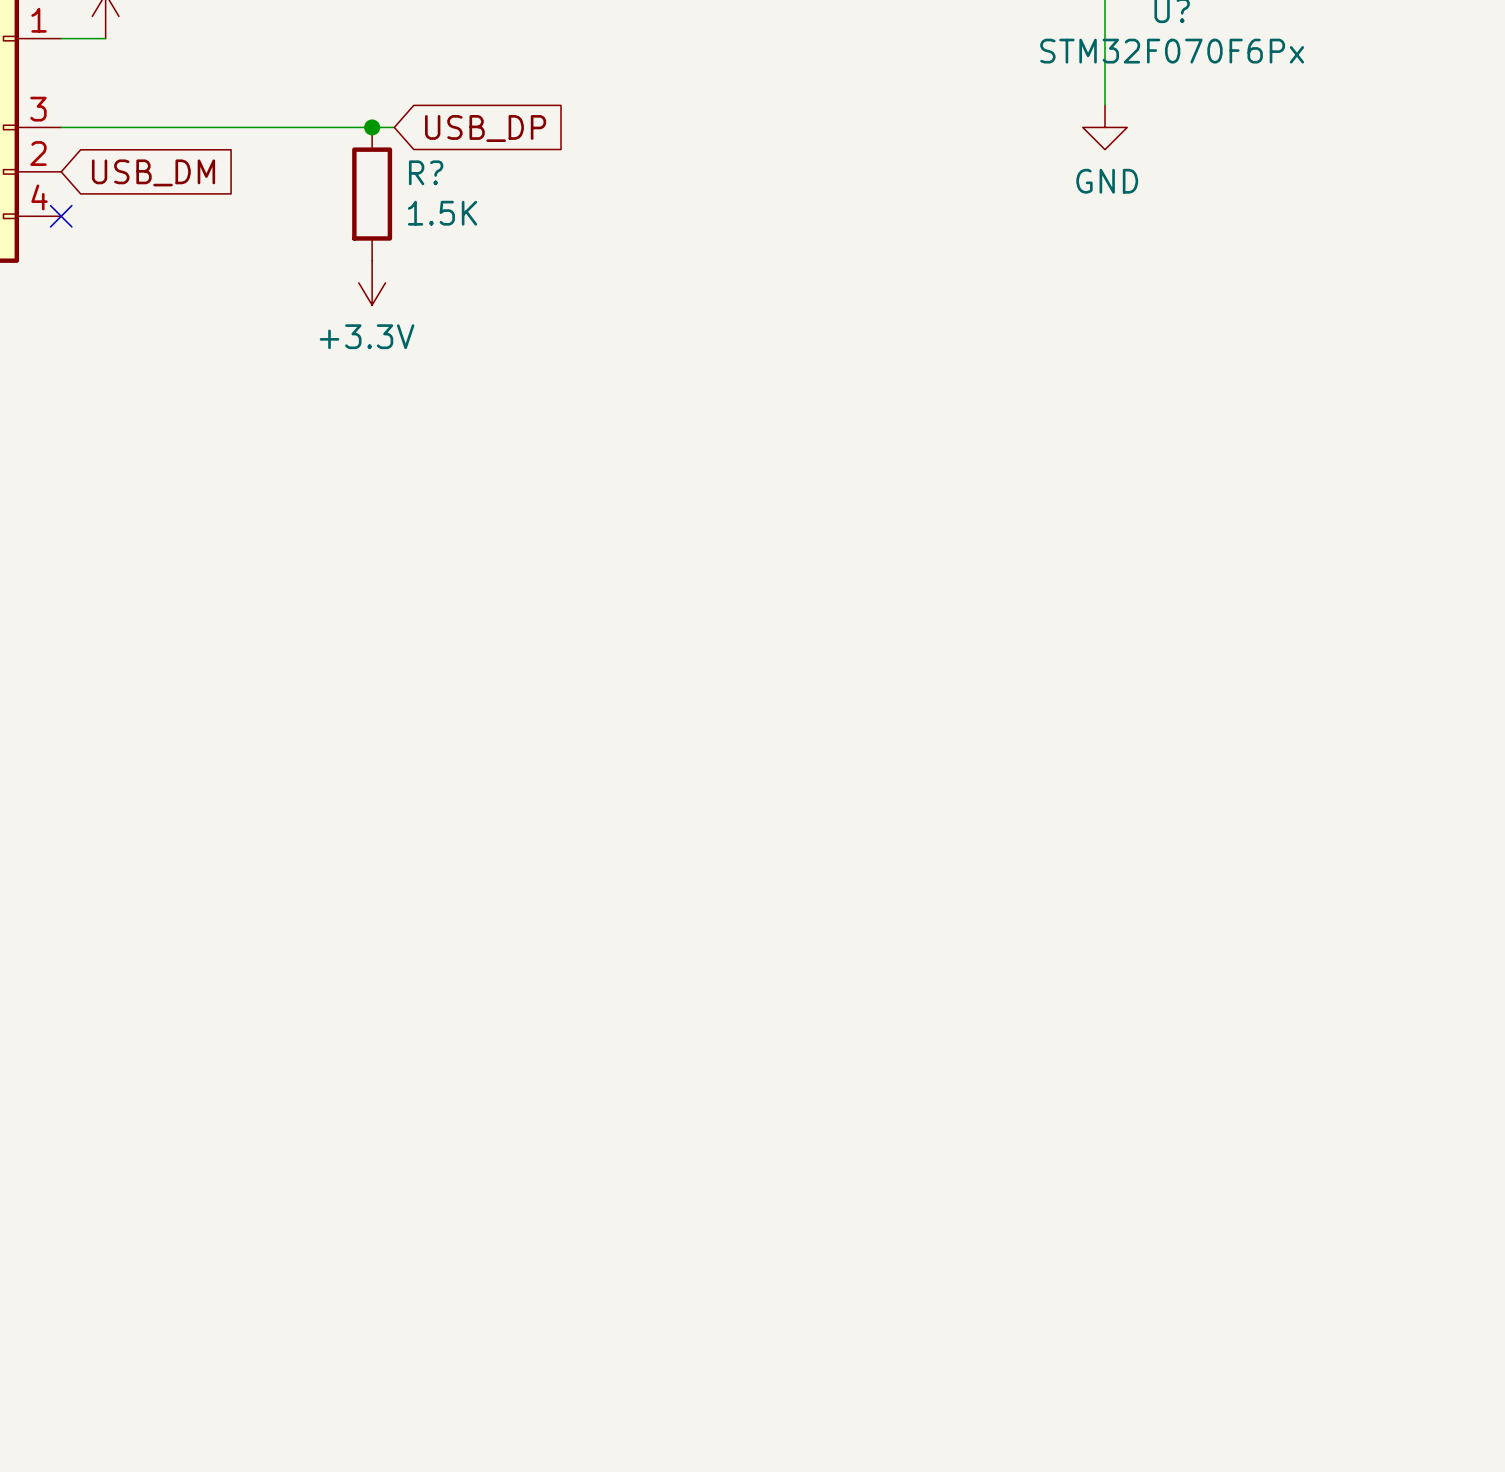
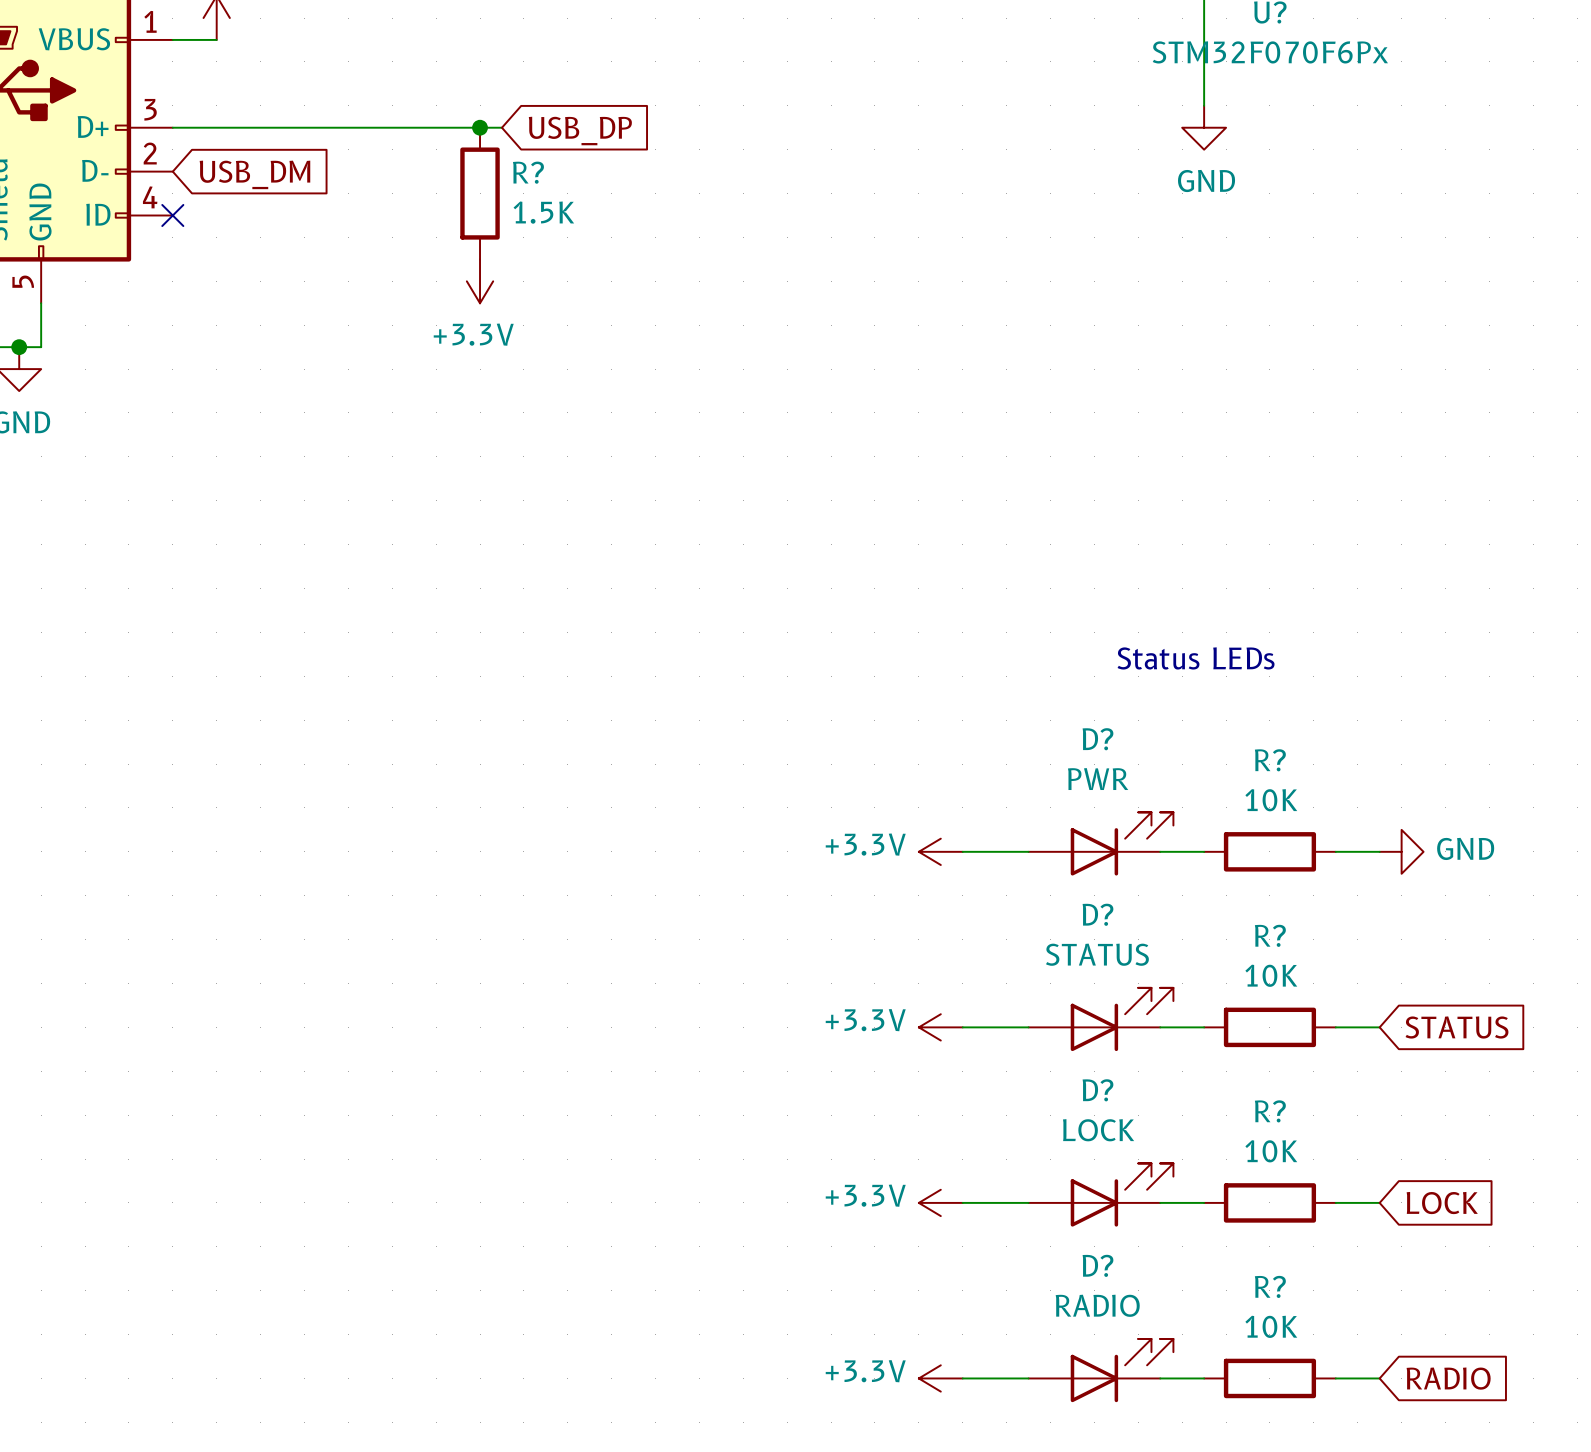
text: none -> Status LEDs (1196, 658)
D?: none -> PWR (1100, 843)
power symbol: none -> +3.3V (940, 851)
wire: none -> (962, 851) (1028, 851)
wire: none -> (1160, 851) (1204, 851)
R?: none -> 10K (1269, 851)
wire: none -> (1335, 851) (1379, 851)
power symbol: none -> GND (1401, 851)
D?: none -> STATUS (1100, 1019)
power symbol: none -> +3.3V (940, 1027)
wire: none -> (962, 1027) (1028, 1027)
wire: none -> (1160, 1027) (1204, 1027)
R?: none -> 10K (1269, 1027)
wire: none -> (1335, 1027) (1379, 1027)
global label: none -> STATUS (1456, 1027)
D?: none -> LOCK (1100, 1195)
power symbol: none -> +3.3V (940, 1202)
wire: none -> (962, 1202) (1028, 1202)
wire: none -> (1160, 1202) (1204, 1202)
R?: none -> 10K (1269, 1202)
wire: none -> (1335, 1202) (1379, 1202)
global label: none -> LOCK (1442, 1203)
D?: none -> RADIO (1100, 1370)
power symbol: none -> +3.3V (940, 1378)
wire: none -> (962, 1378) (1028, 1378)
wire: none -> (1160, 1378) (1204, 1378)
R?: none -> 10K (1269, 1378)
wire: none -> (1335, 1378) (1379, 1378)
global label: none -> RADIO (1448, 1378)

